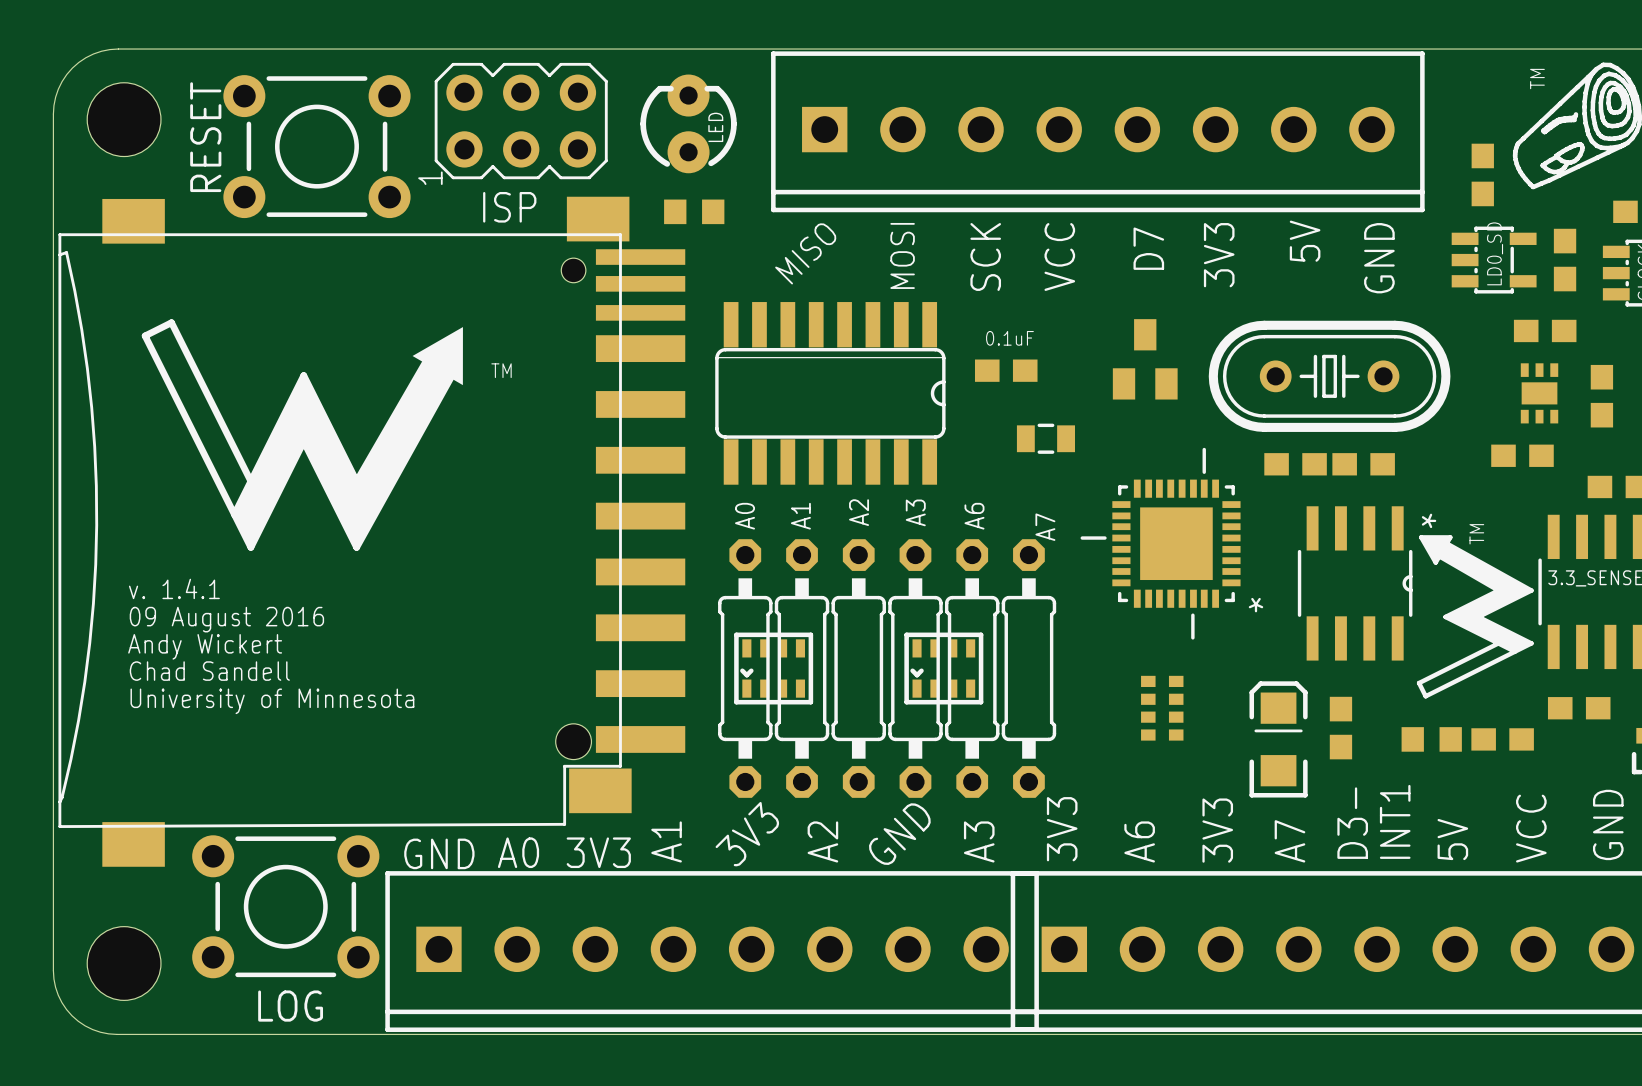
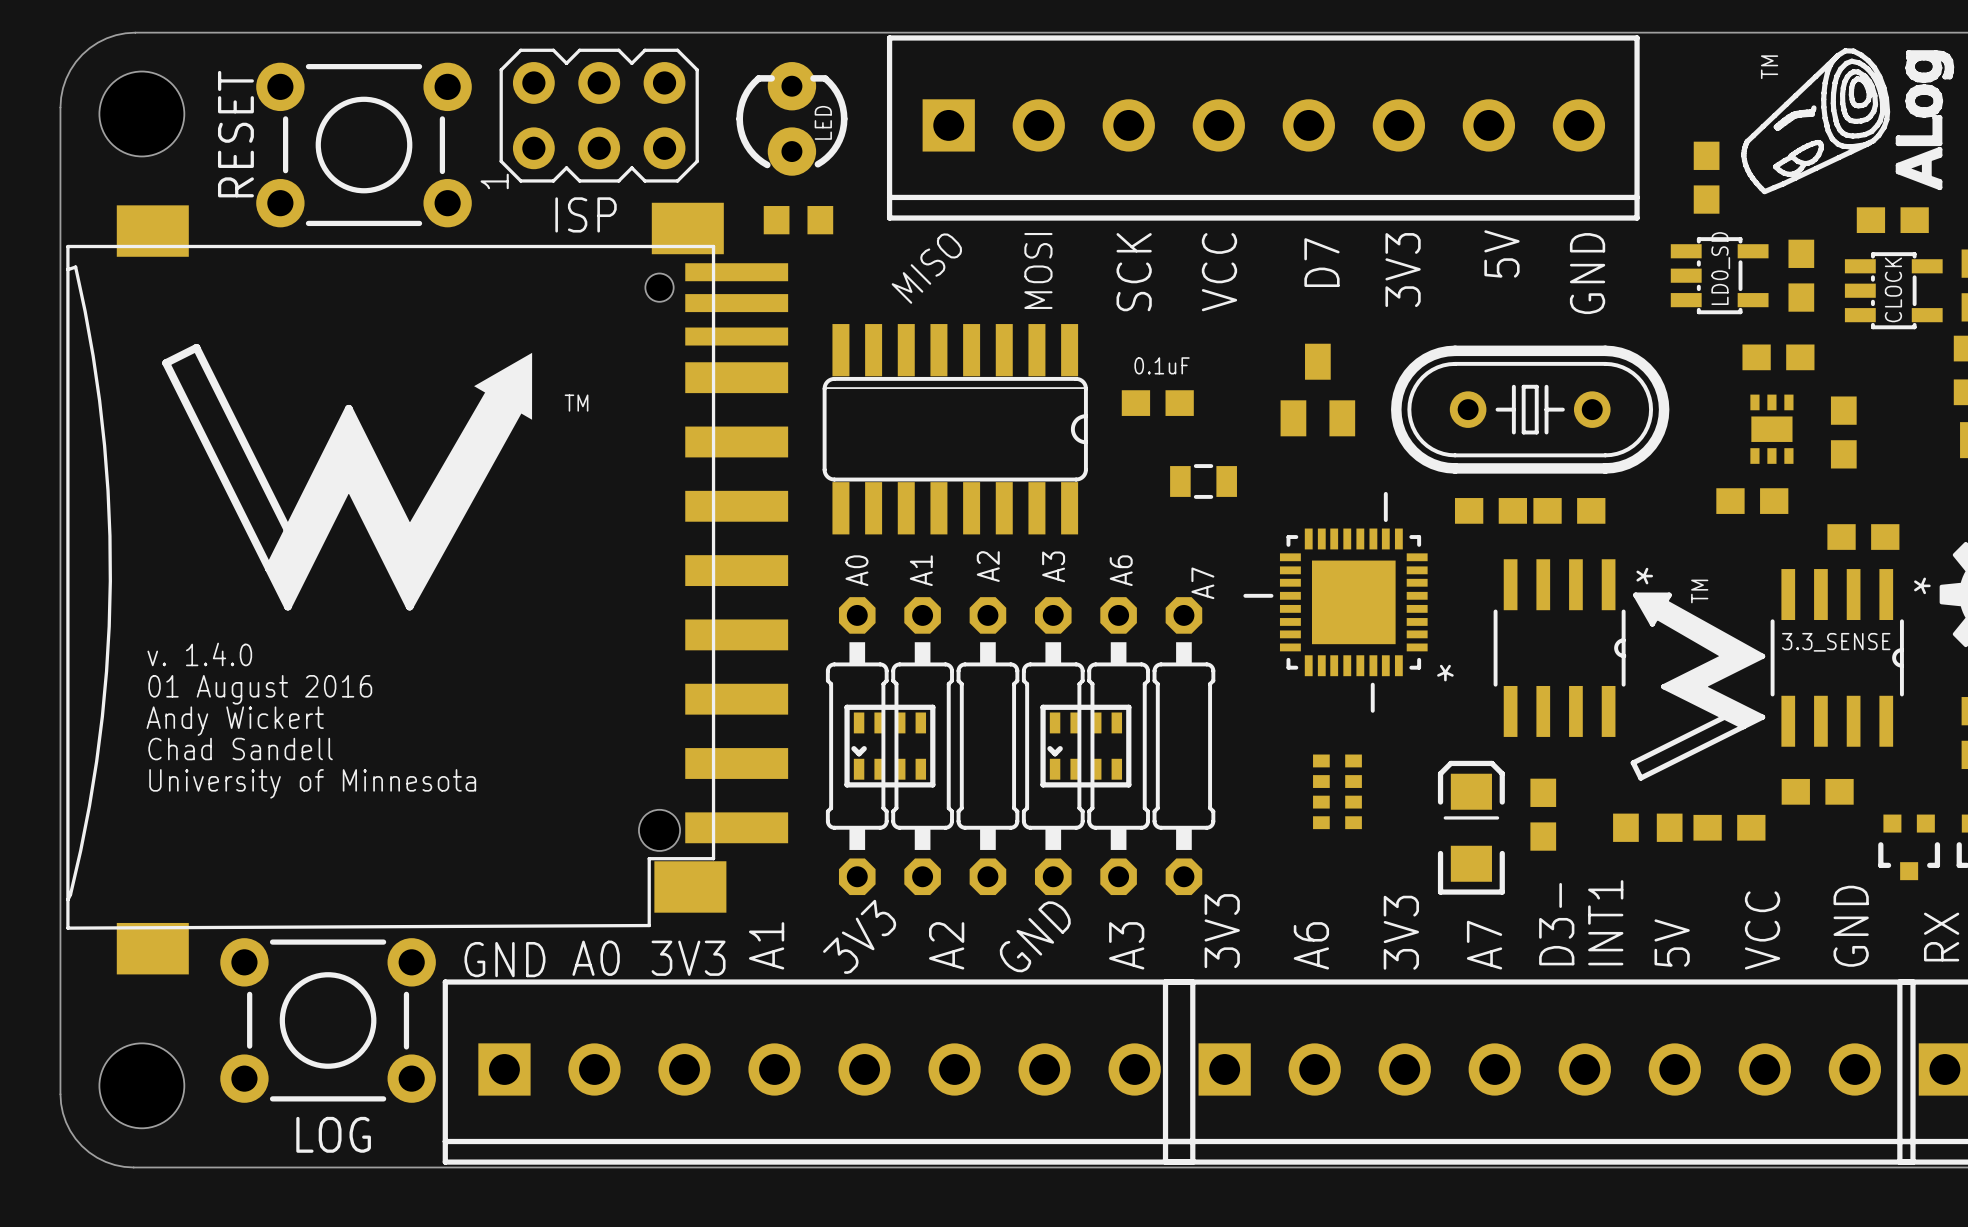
text: v. 1.4.1 (174, 588) -> v. 1.4.0 (199, 654)
text: 09 August 2016 (226, 619) -> 01 August 2016 (260, 689)

